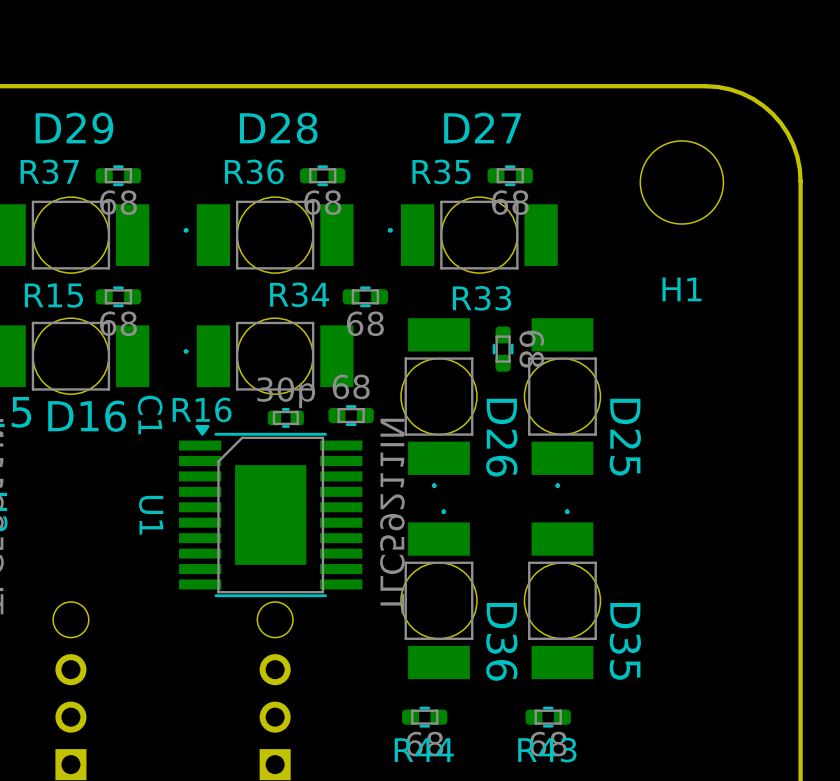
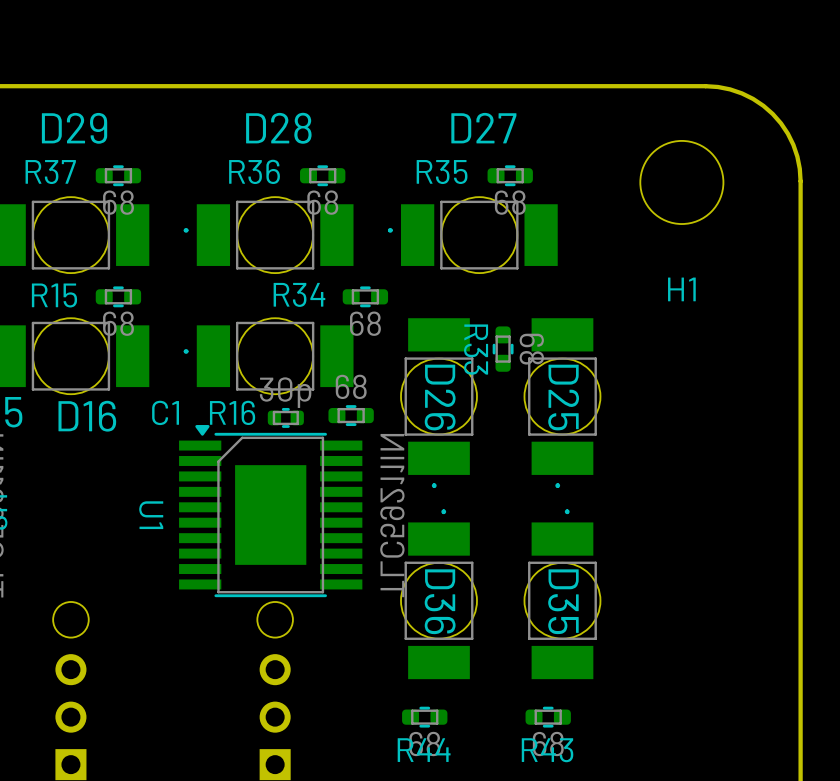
R33 name rotation: 0° (482, 298) -> 90° clockwise (476, 349)
R16 name position: R16 (202, 409) -> R16 (232, 412)
C1 name rotation: 0° (150, 414) -> 90° counterclockwise (165, 412)
D26 name position: D26 (501, 437) -> D26 (440, 397)
D25 name position: D25 (625, 437) -> D25 (563, 397)
D36 name position: D36 (501, 641) -> D36 (440, 601)
D35 name position: D35 (625, 641) -> D35 (563, 601)

